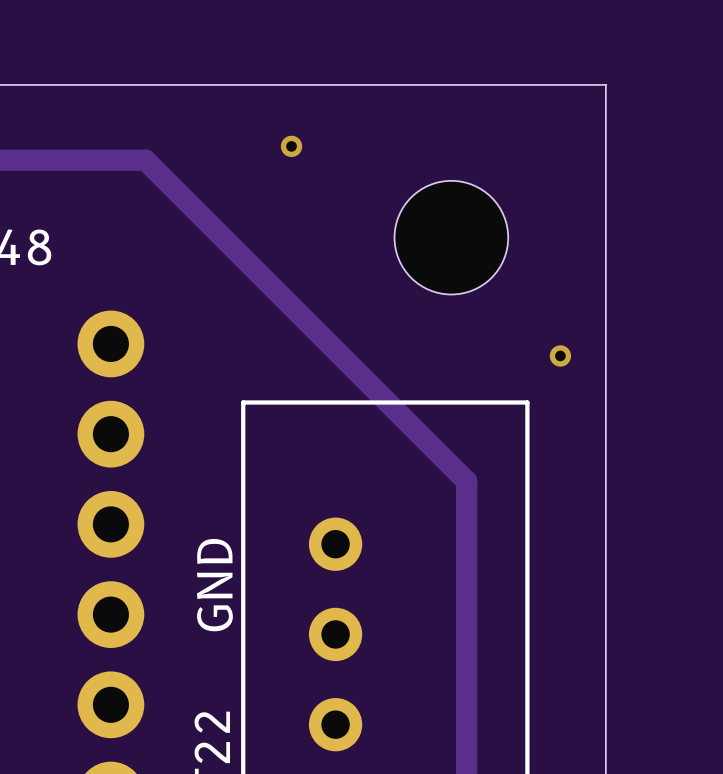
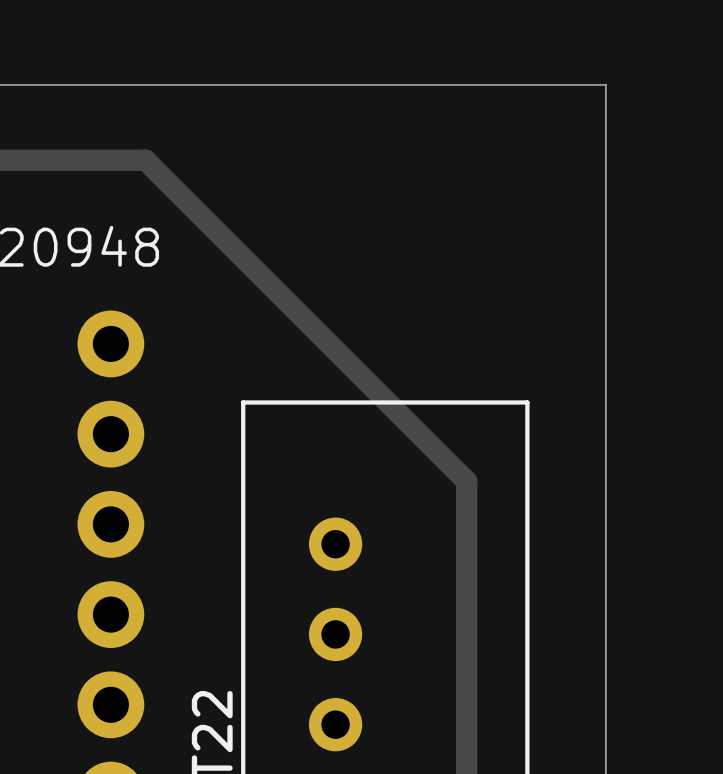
via: (291, 146) -> none
part: (451, 237) -> none
via: (560, 355) -> none
text: GND (214, 585) -> none

